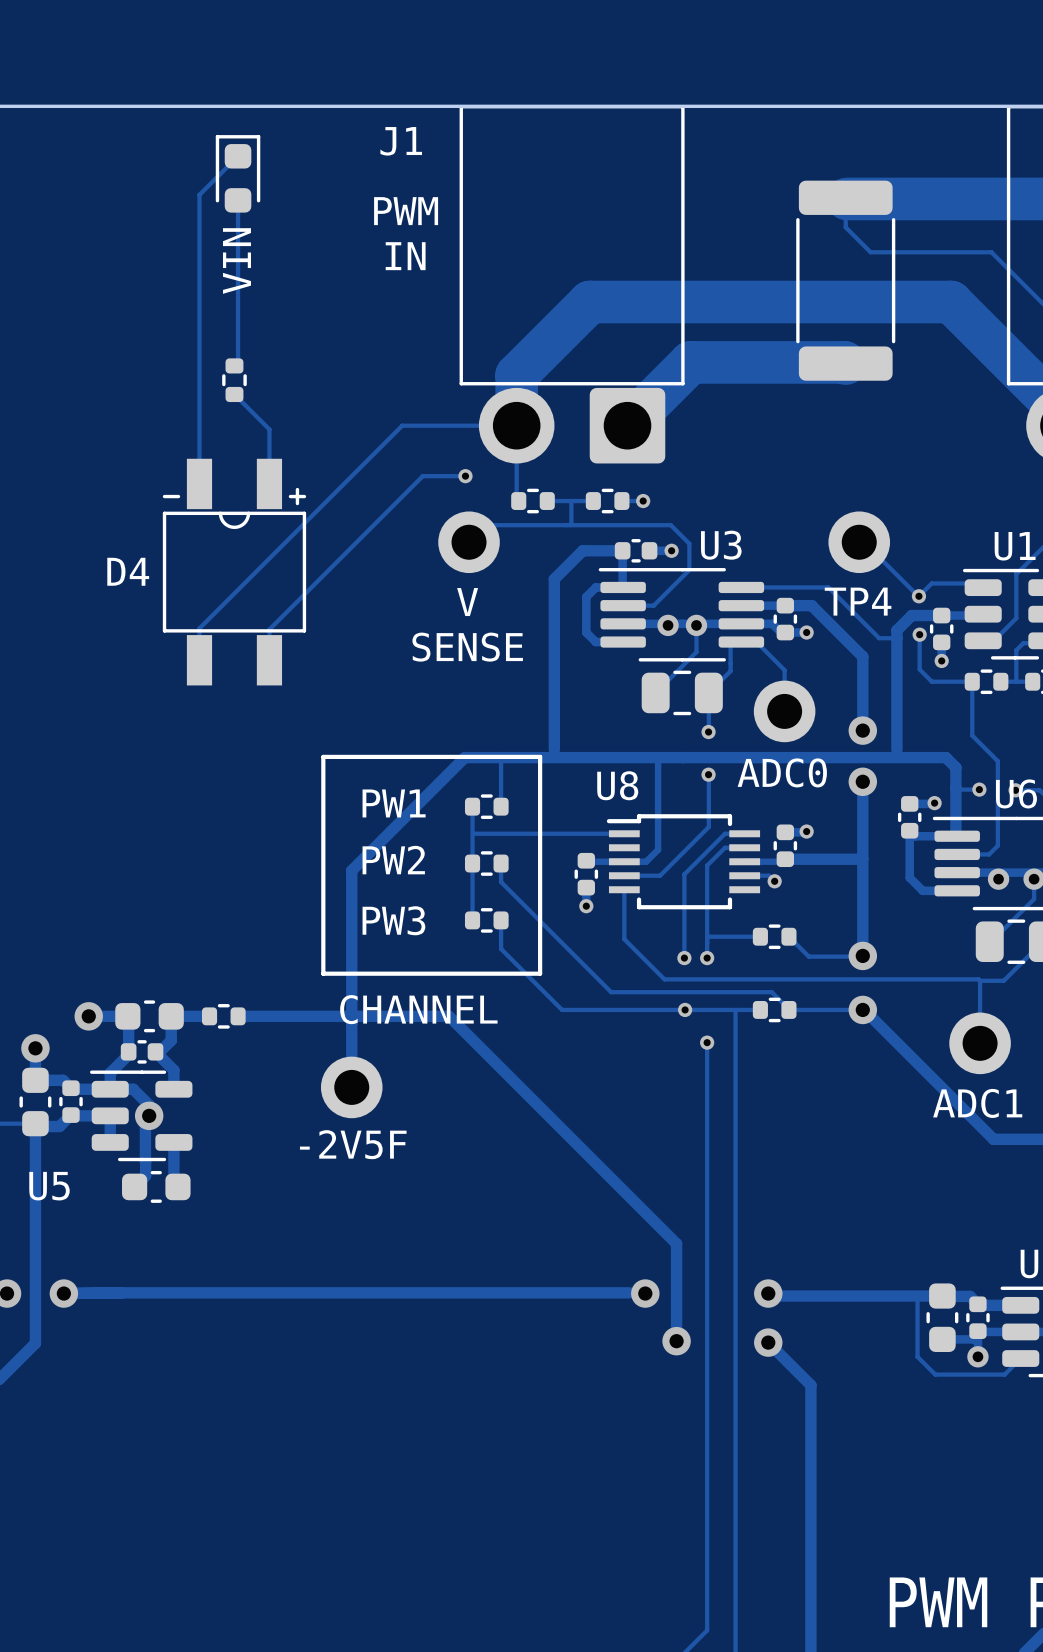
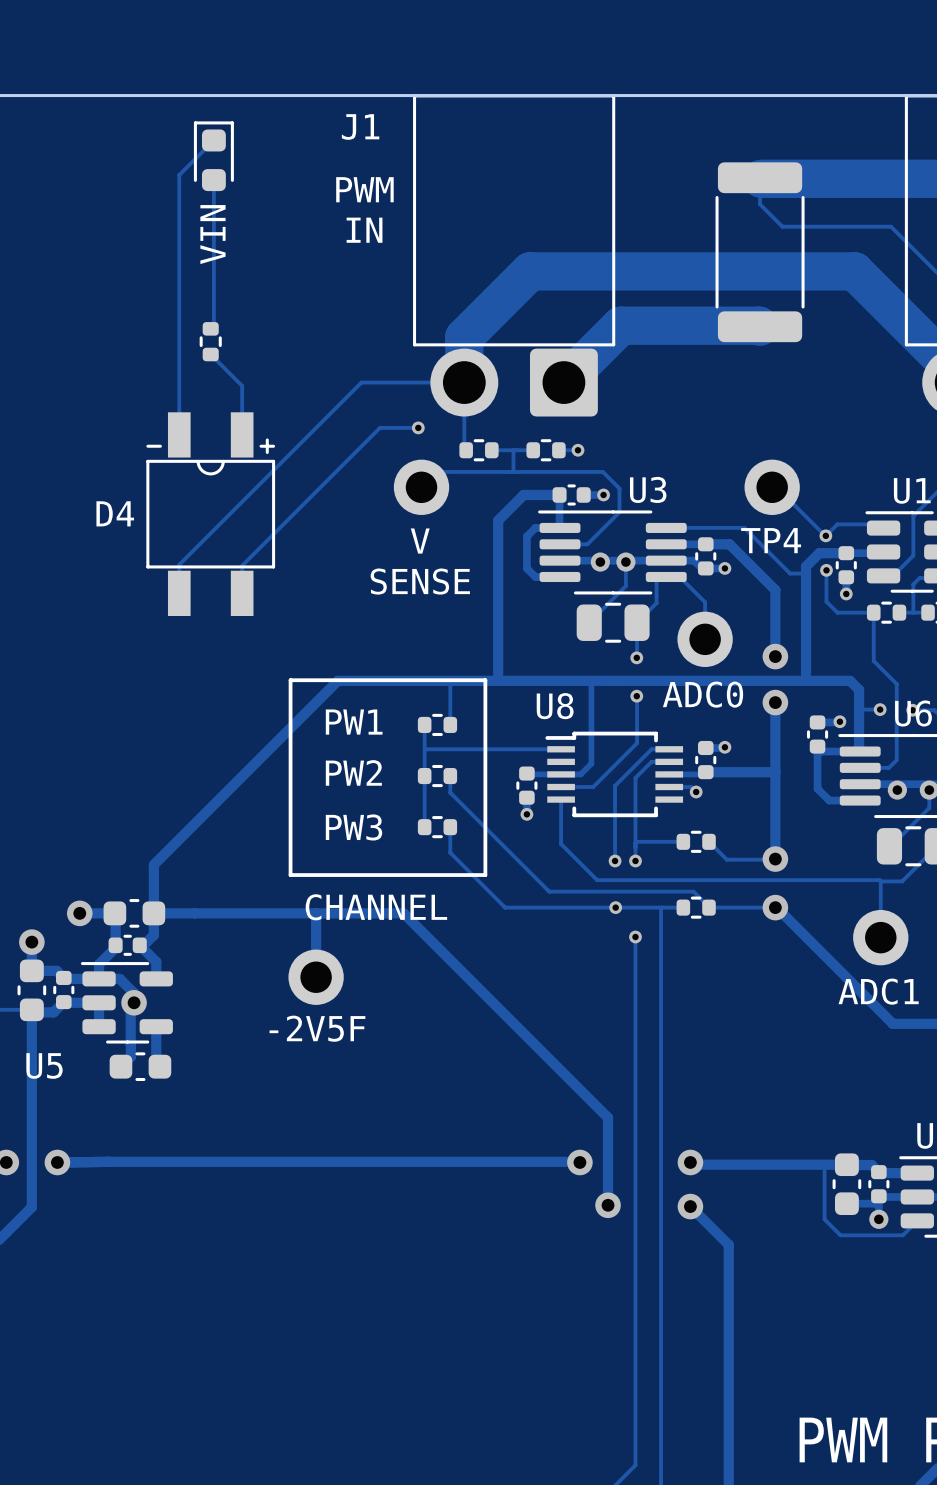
track: (464, 757) (351, 870) (351, 1016) -> (417, 680) (337, 680) (153, 864) (153, 913)
track: none -> (188, 913) (213, 913)
part: (223, 1016) -> none

